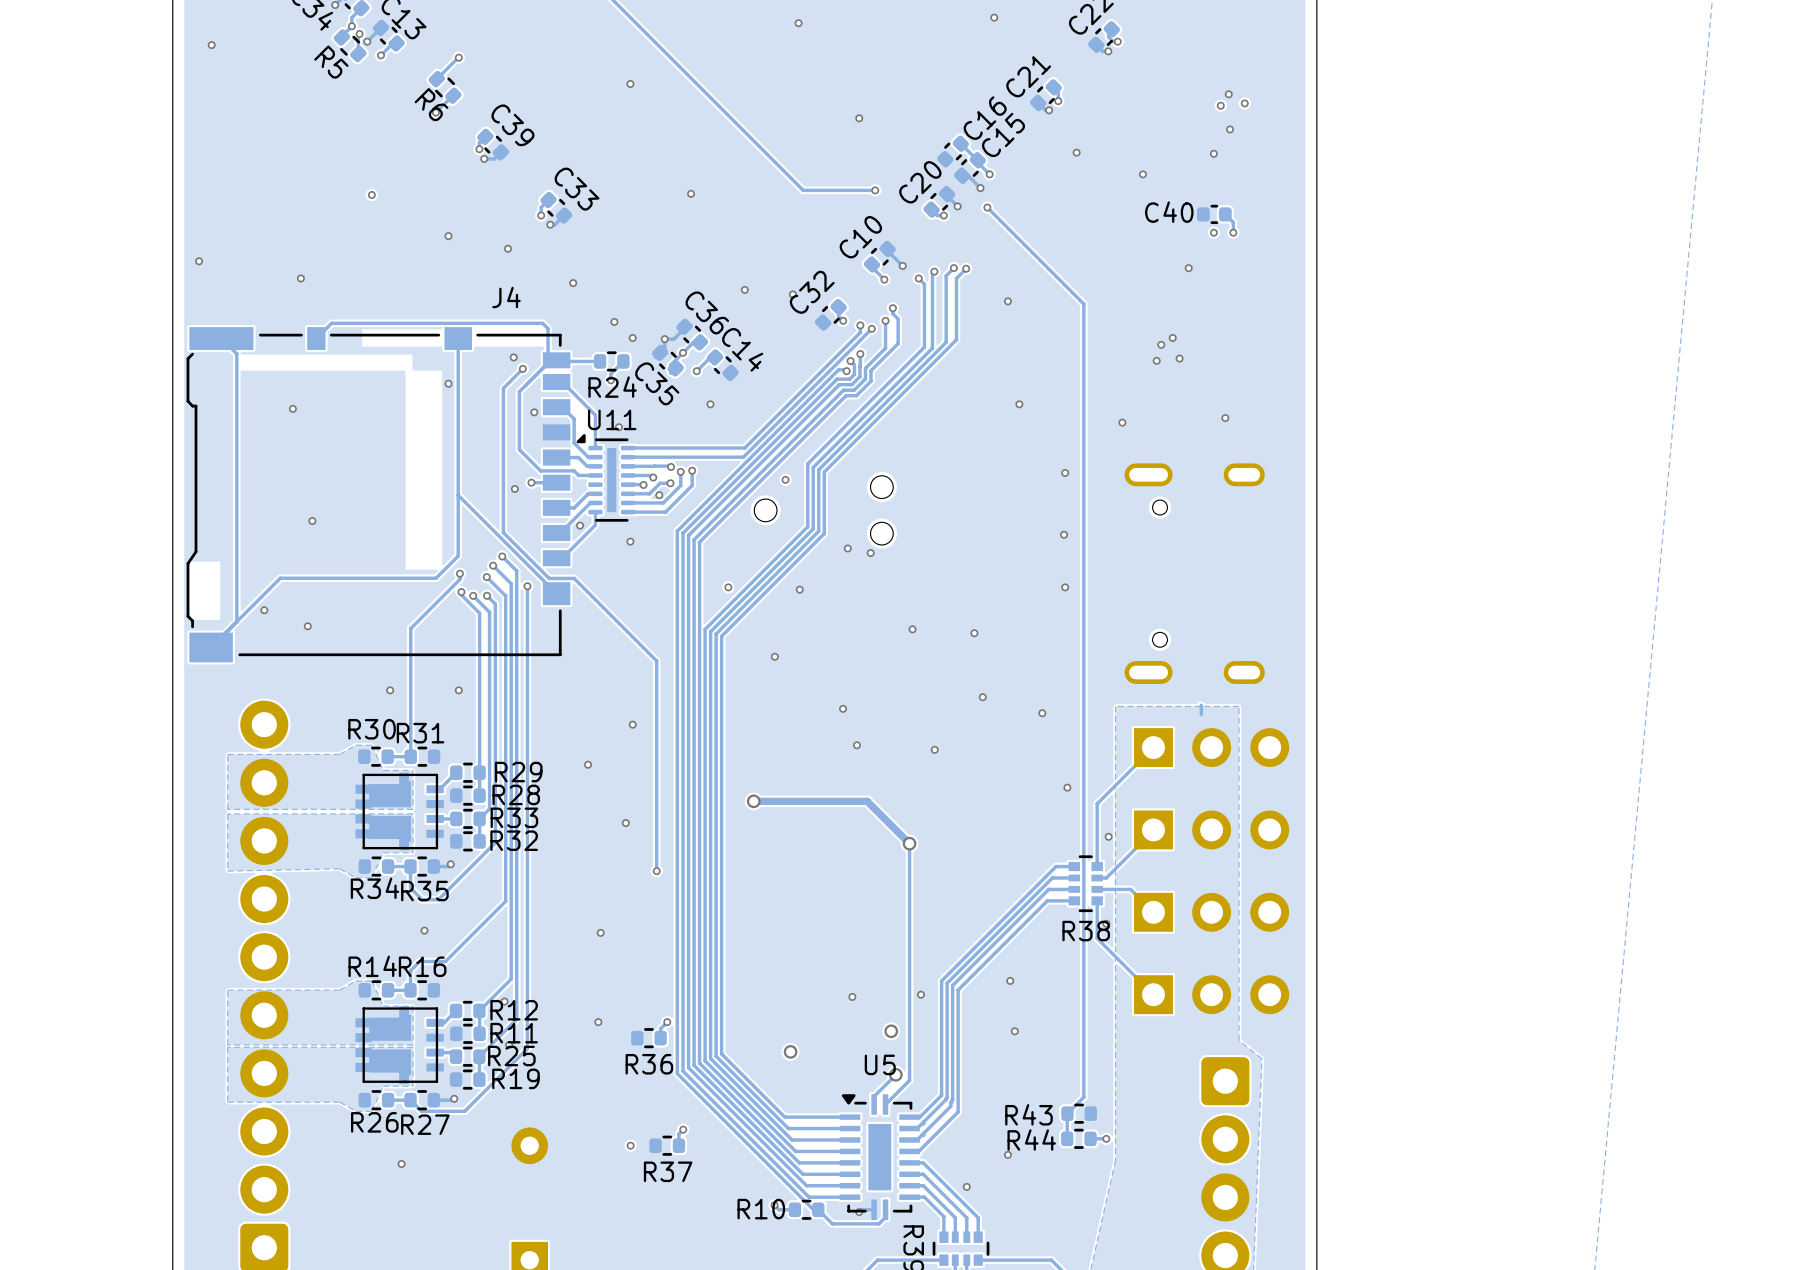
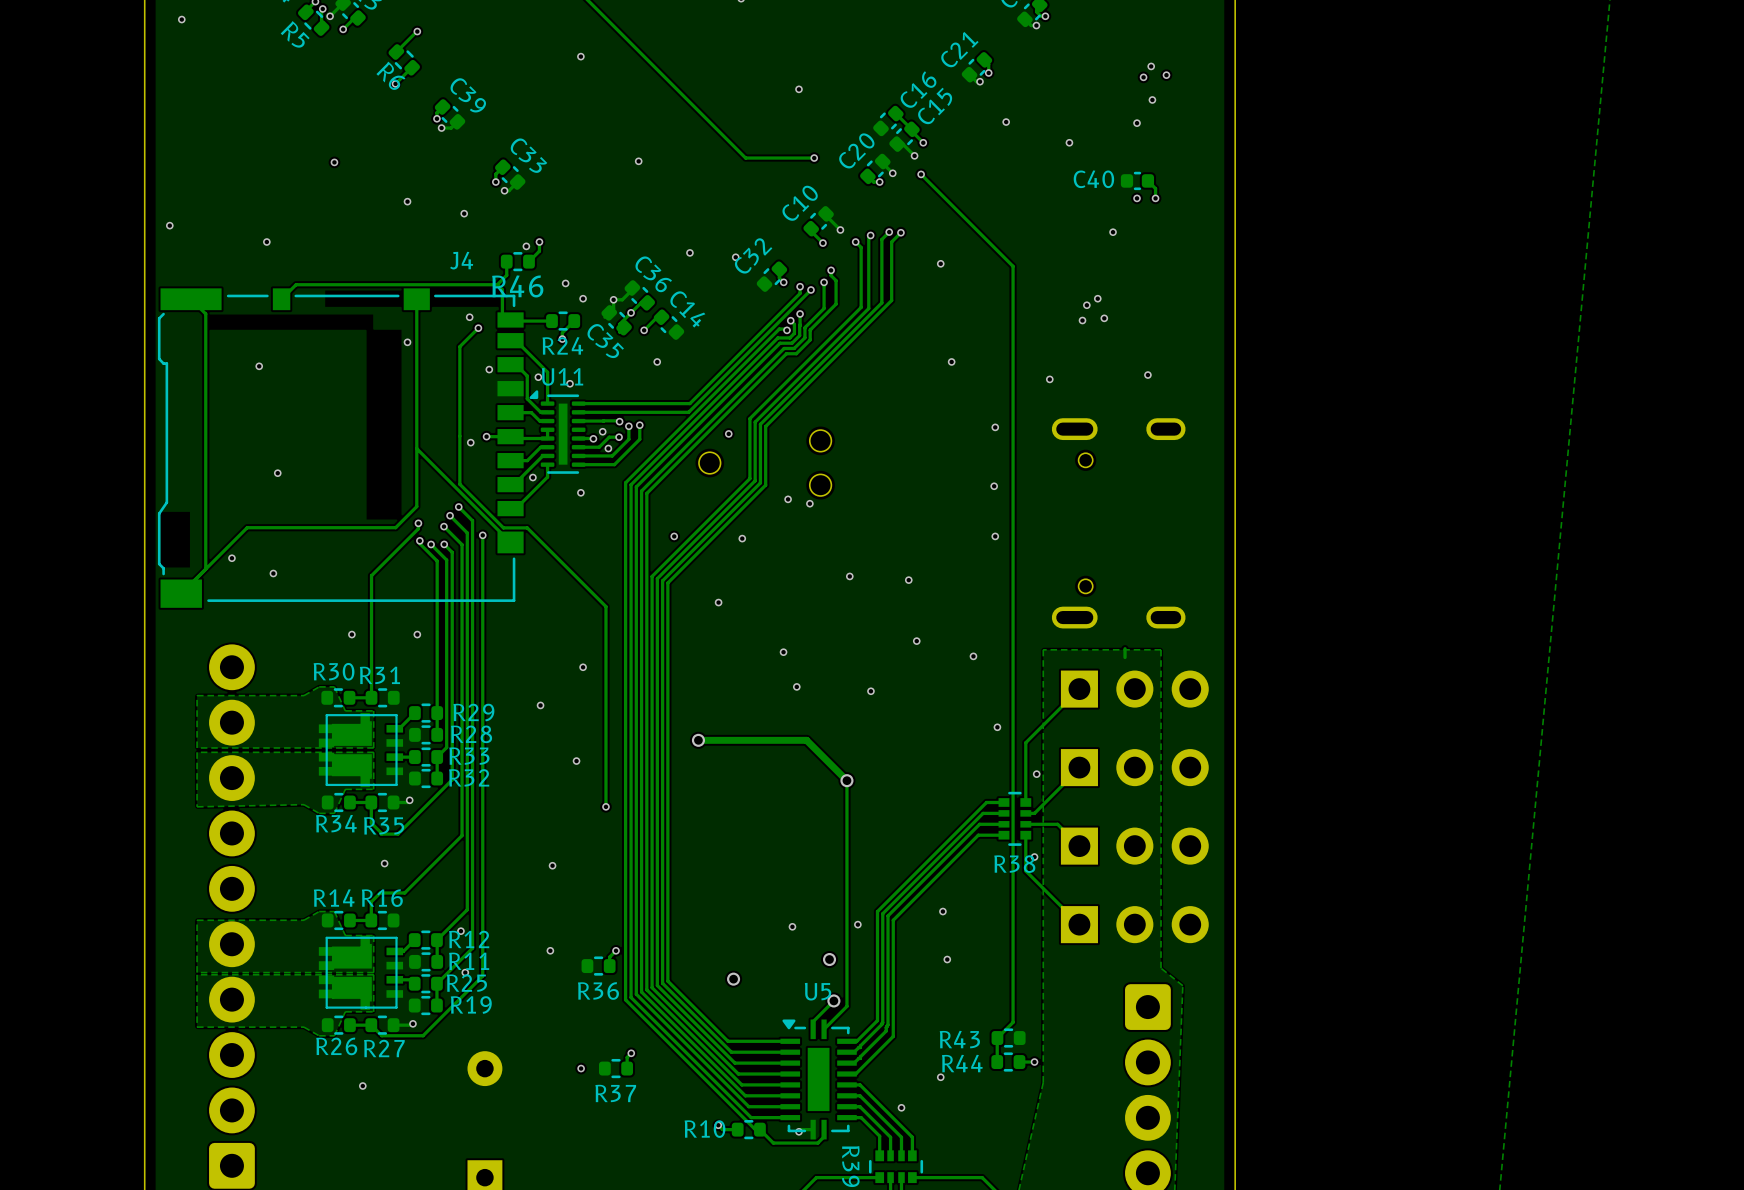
track: none -> (539, 242) (539, 251) (528, 261)
via: none -> (539, 242)
track: none -> (506, 261) (506, 275) (497, 284)
R46: none -> (517, 261)
track: (550, 360) (519, 391) (519, 449) (540, 470) (574, 470) (578, 475) (595, 475) -> (510, 436) (512, 438) (547, 438) (547, 429)
via: none -> (538, 377)
track: (628, 475) (651, 475) (653, 477) -> none

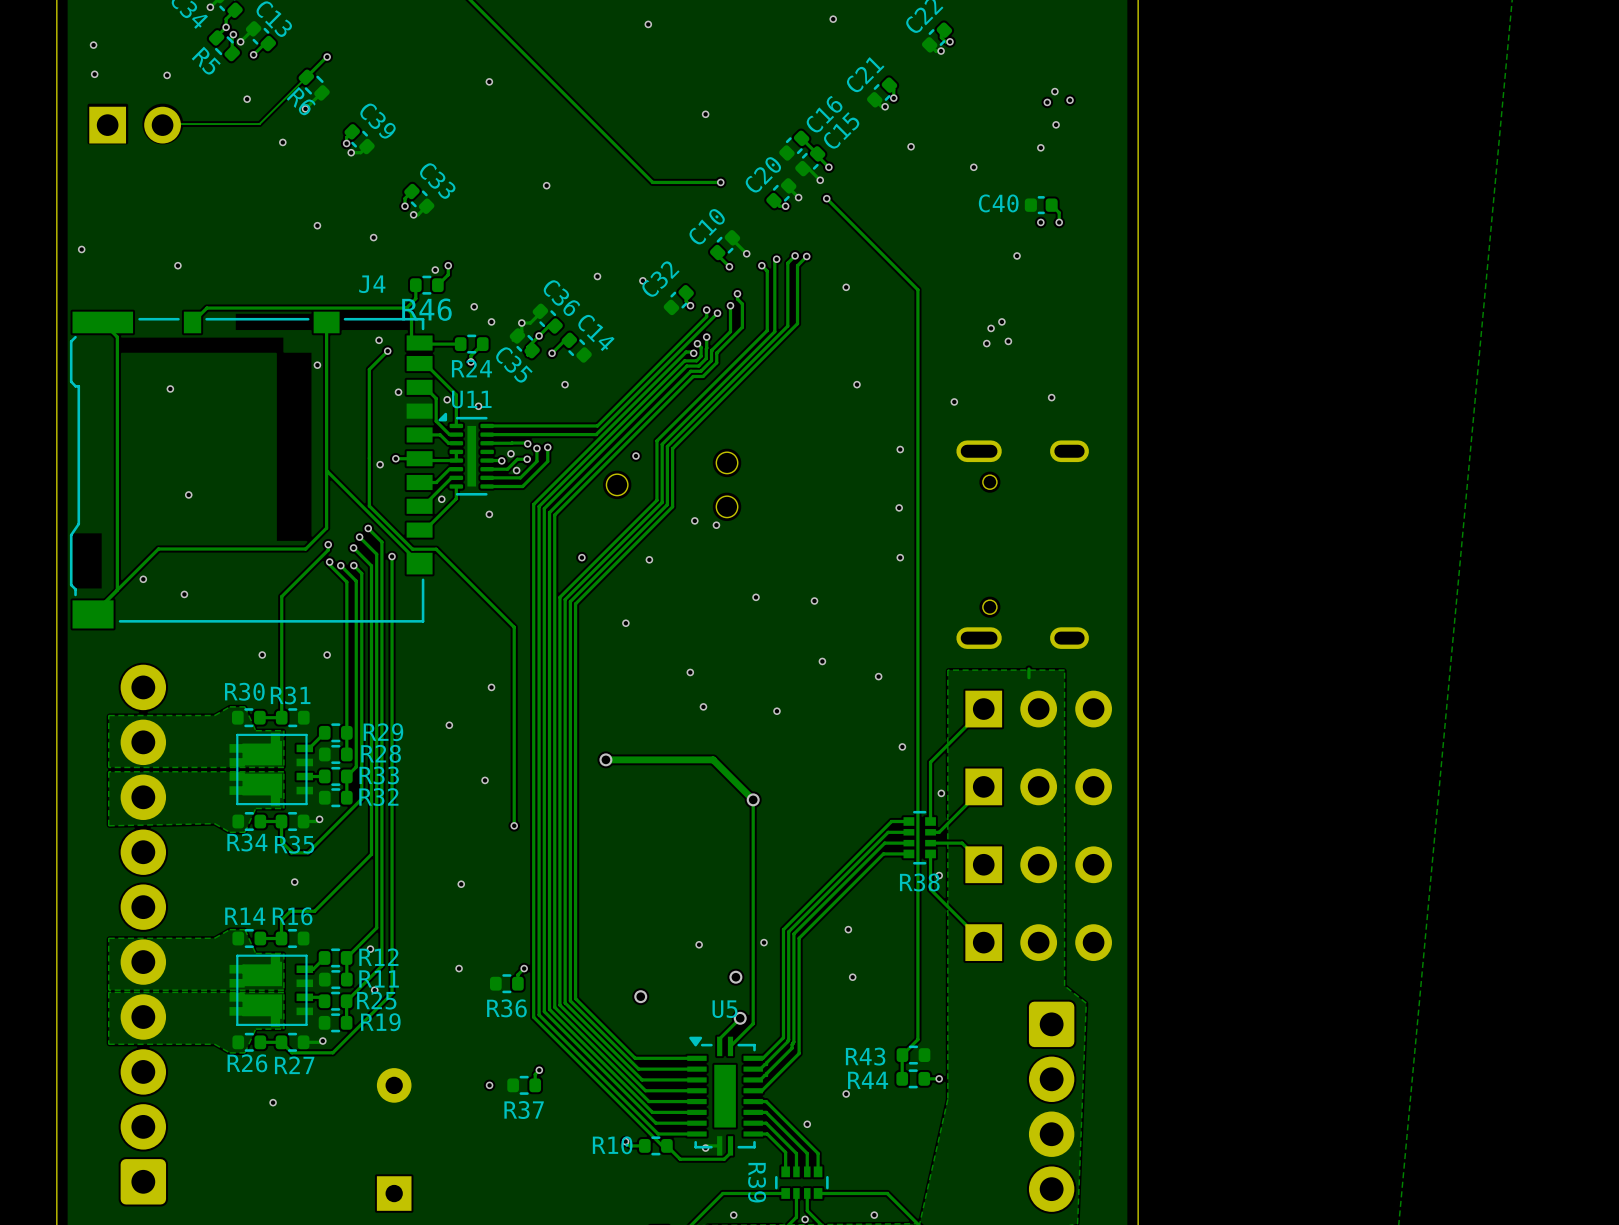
via: none -> (94, 74)
via: none -> (167, 75)
track: none -> (306, 77) (259, 124) (162, 124)
via: none -> (247, 99)
part: none -> (135, 125)
via: none -> (282, 142)
via: (334, 162) -> none

